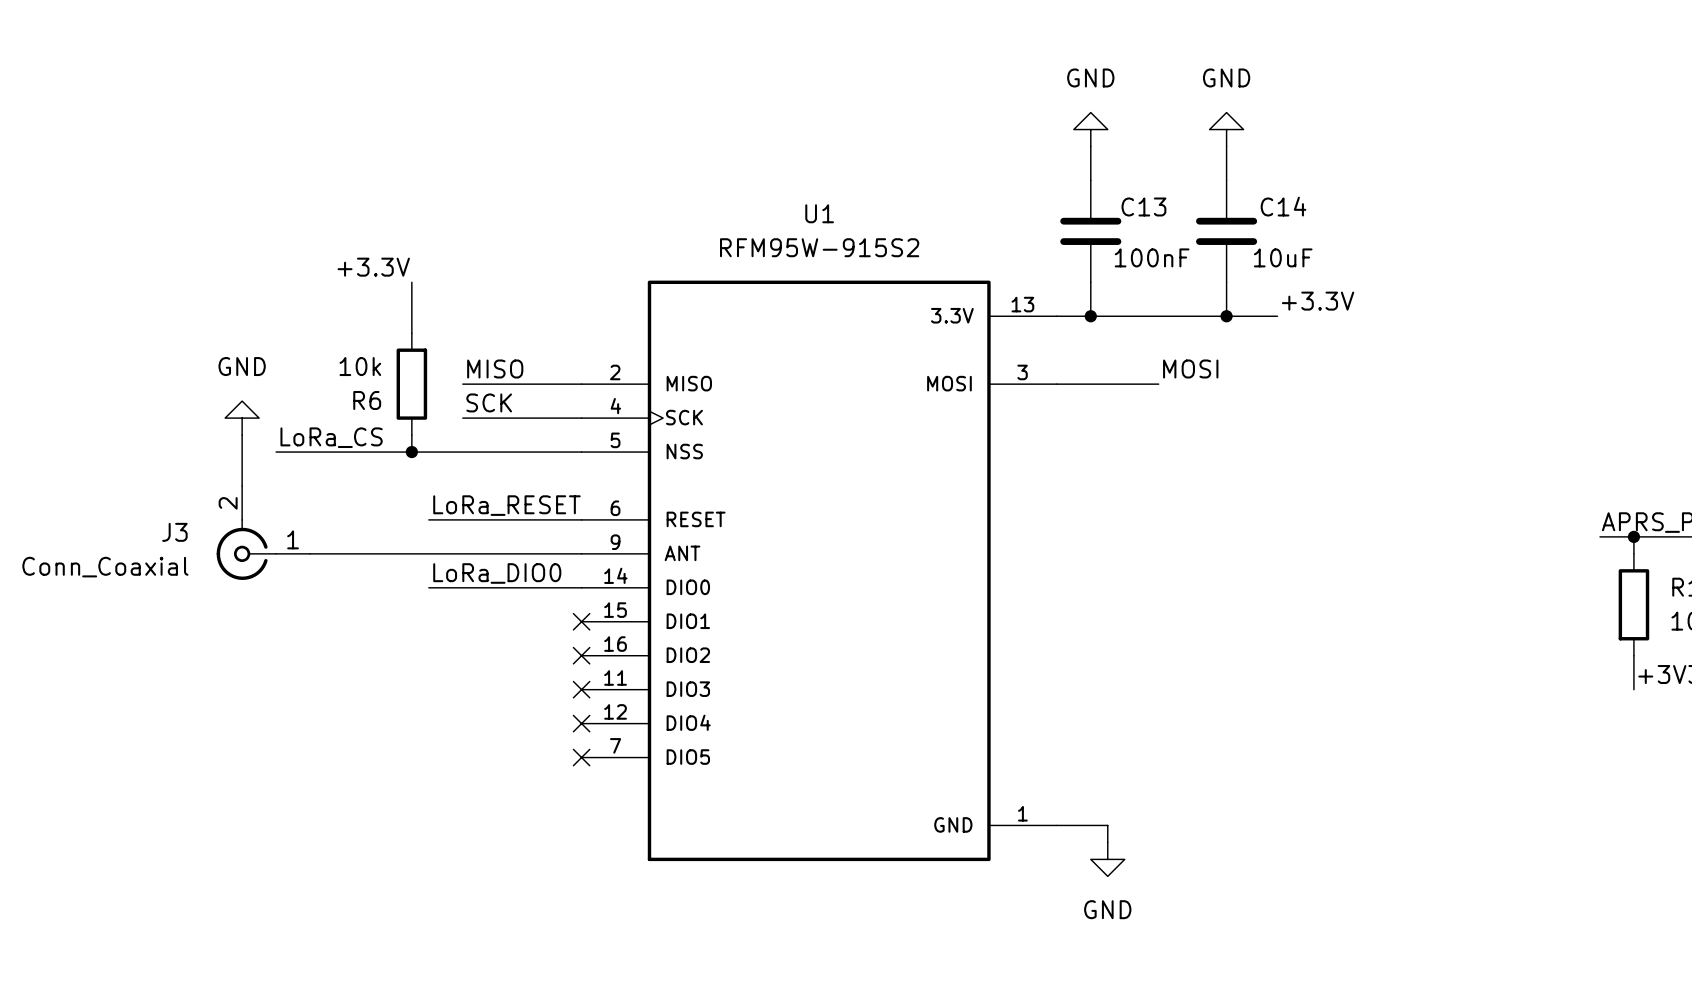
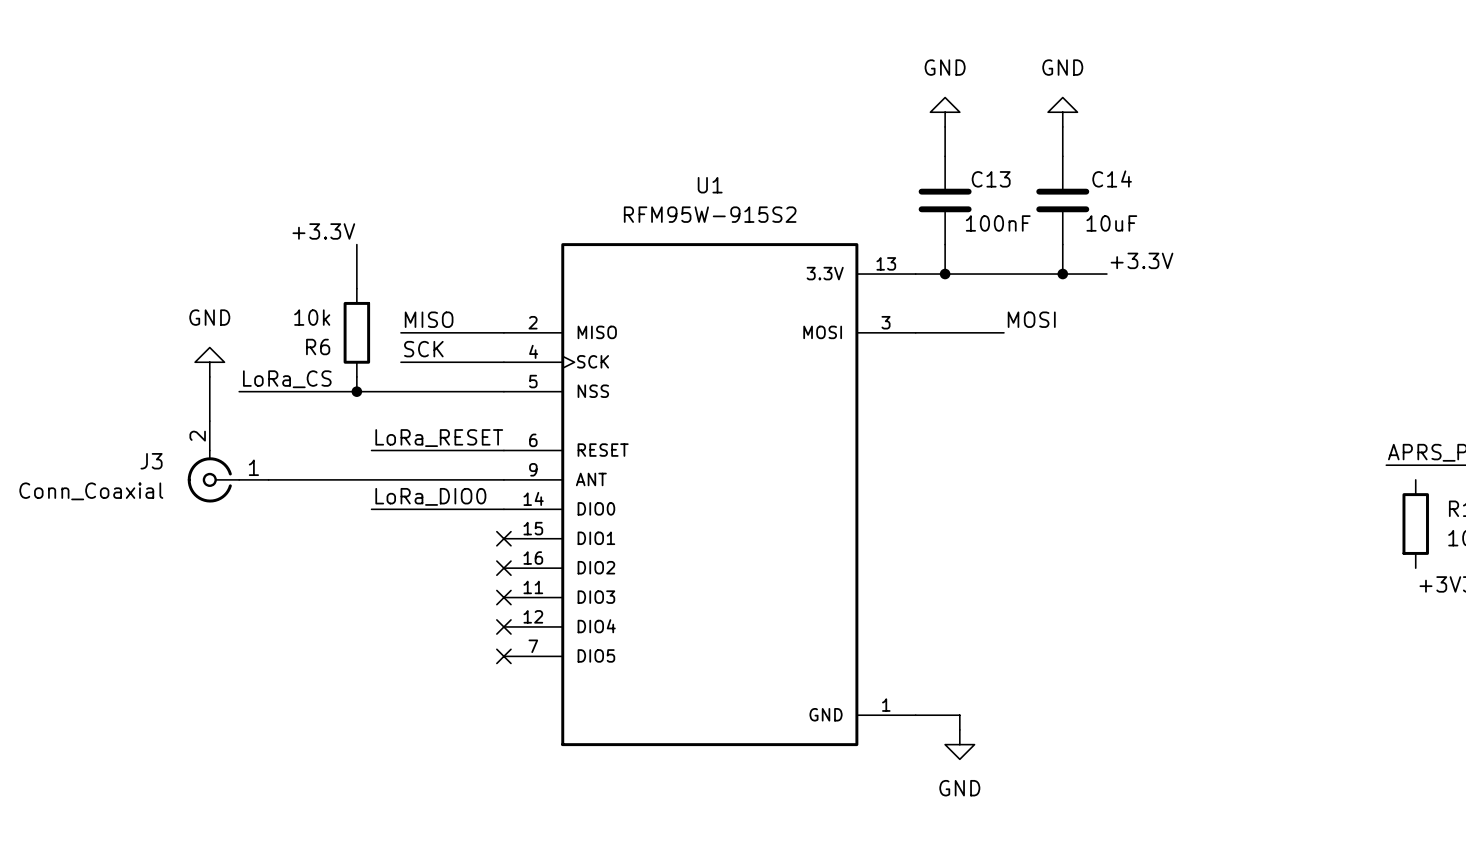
wire: (1633, 536) (1633, 553) -> none
junction: (1633, 536) -> none
wire: (1633, 655) (1633, 689) -> none

